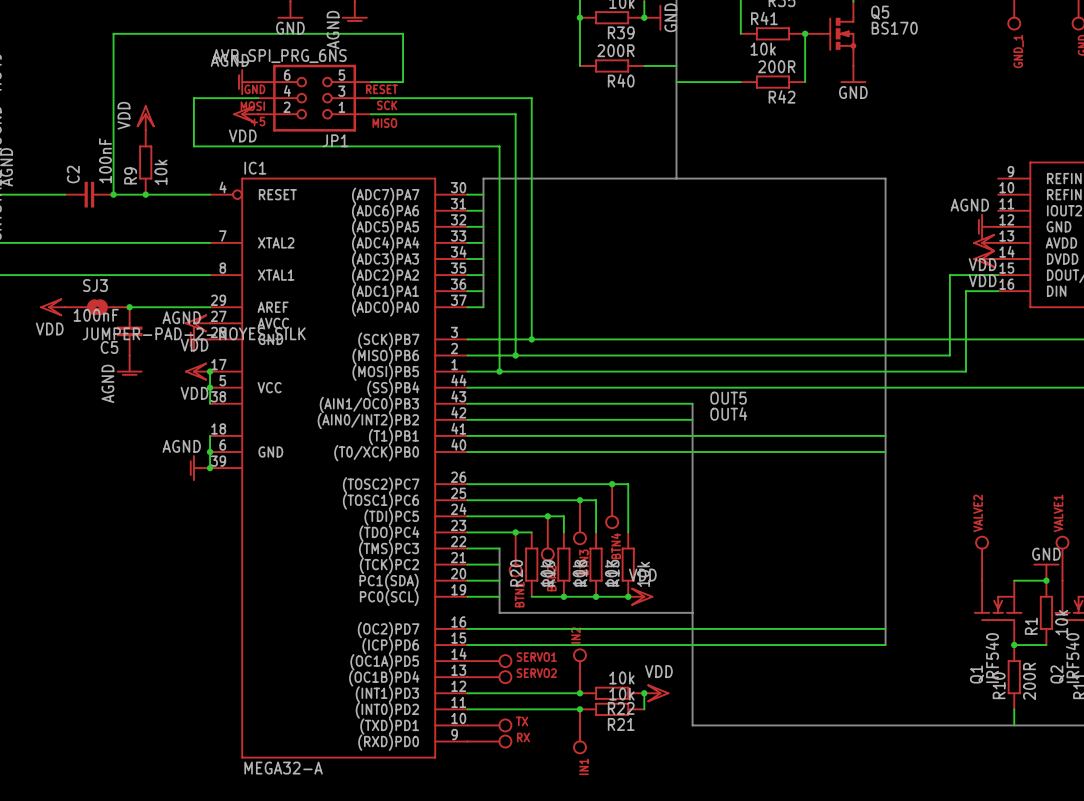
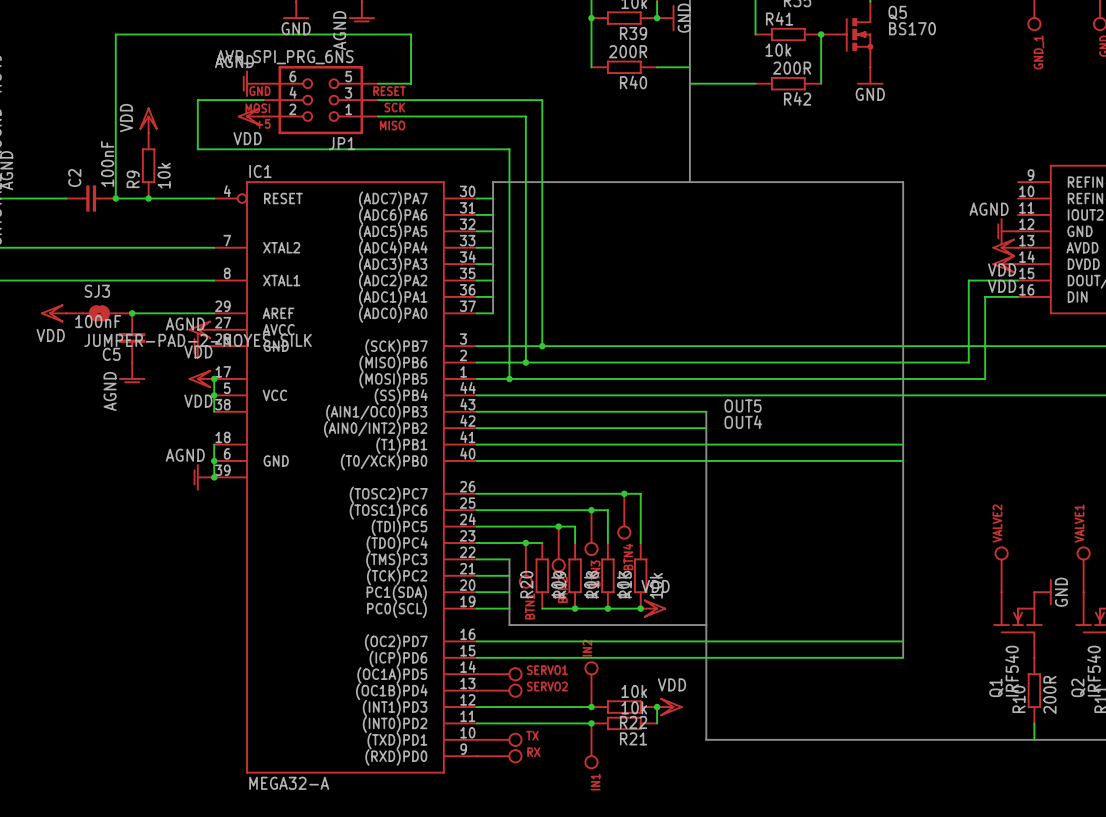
power symbol rotation: 0° (1046, 564) -> 90° clockwise (1050, 592)
power symbol position: GND (1046, 572) -> GND (1042, 592)
junction: (1046, 580) -> none
R1: 10k (1046, 612) -> none
wire: (1014, 645) (1046, 645) -> none
junction: (1014, 645) -> none

